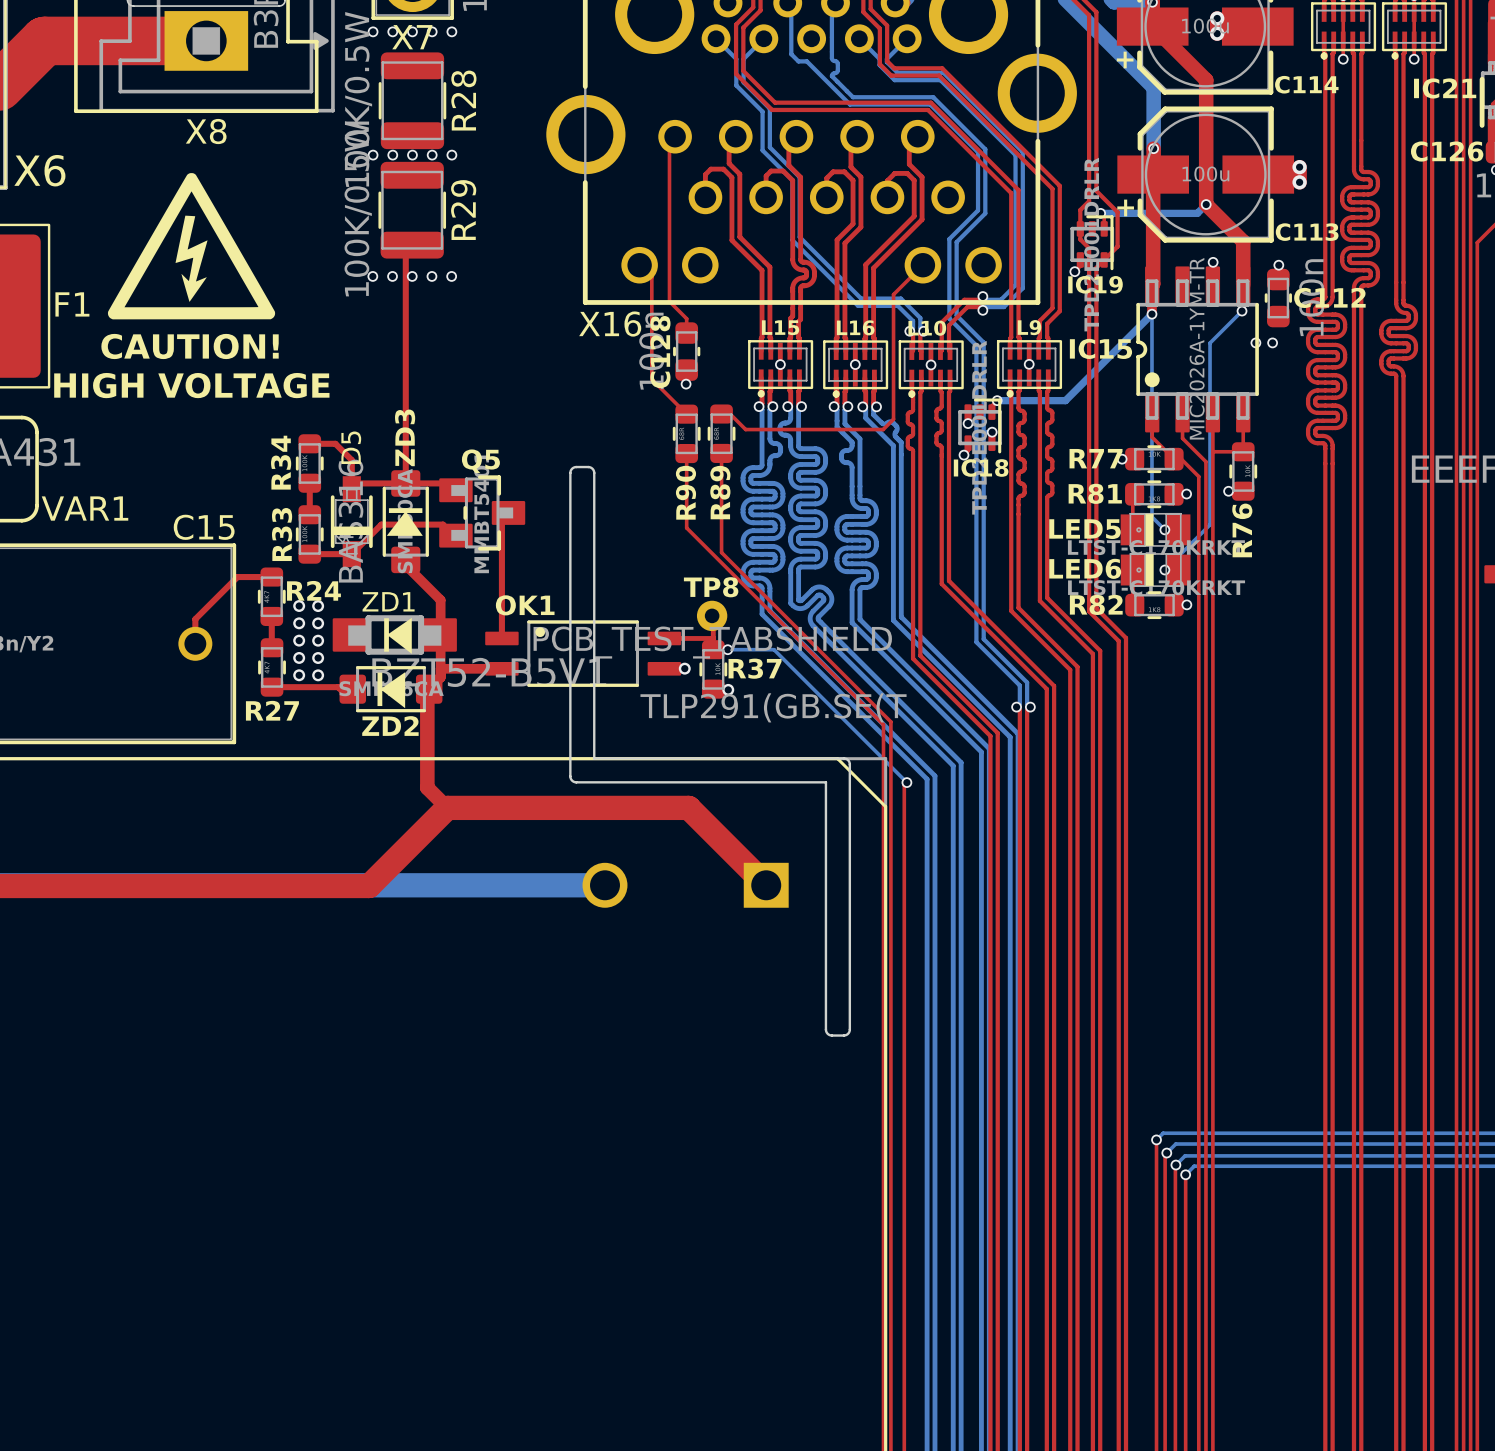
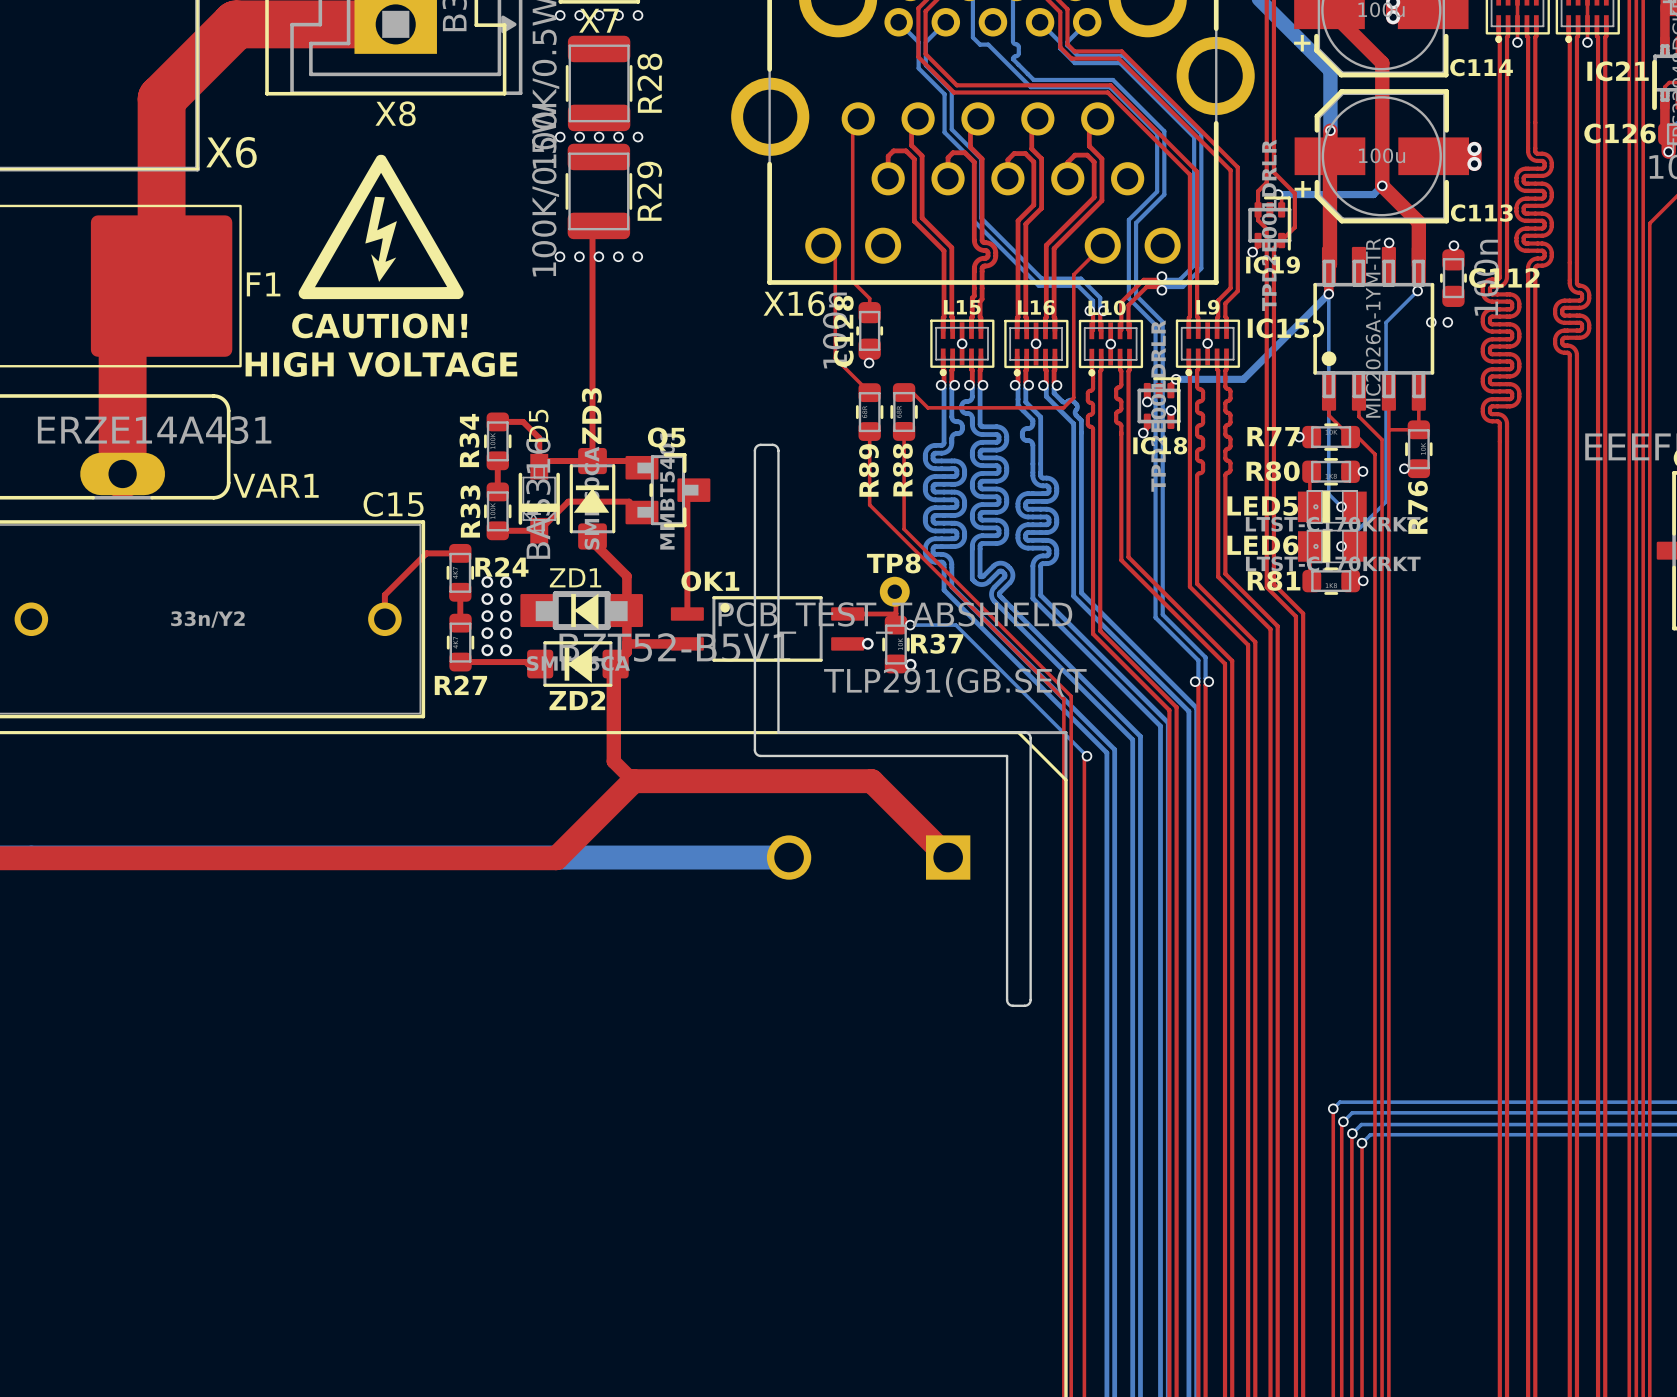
R90 name: R90 (685, 492) -> R89 (868, 470)
R89 name: R89 (720, 492) -> R88 (902, 470)
R81 name: R81 (1095, 493) -> R80 (1273, 471)
R82 name: R82 (1096, 604) -> R81 (1274, 580)

